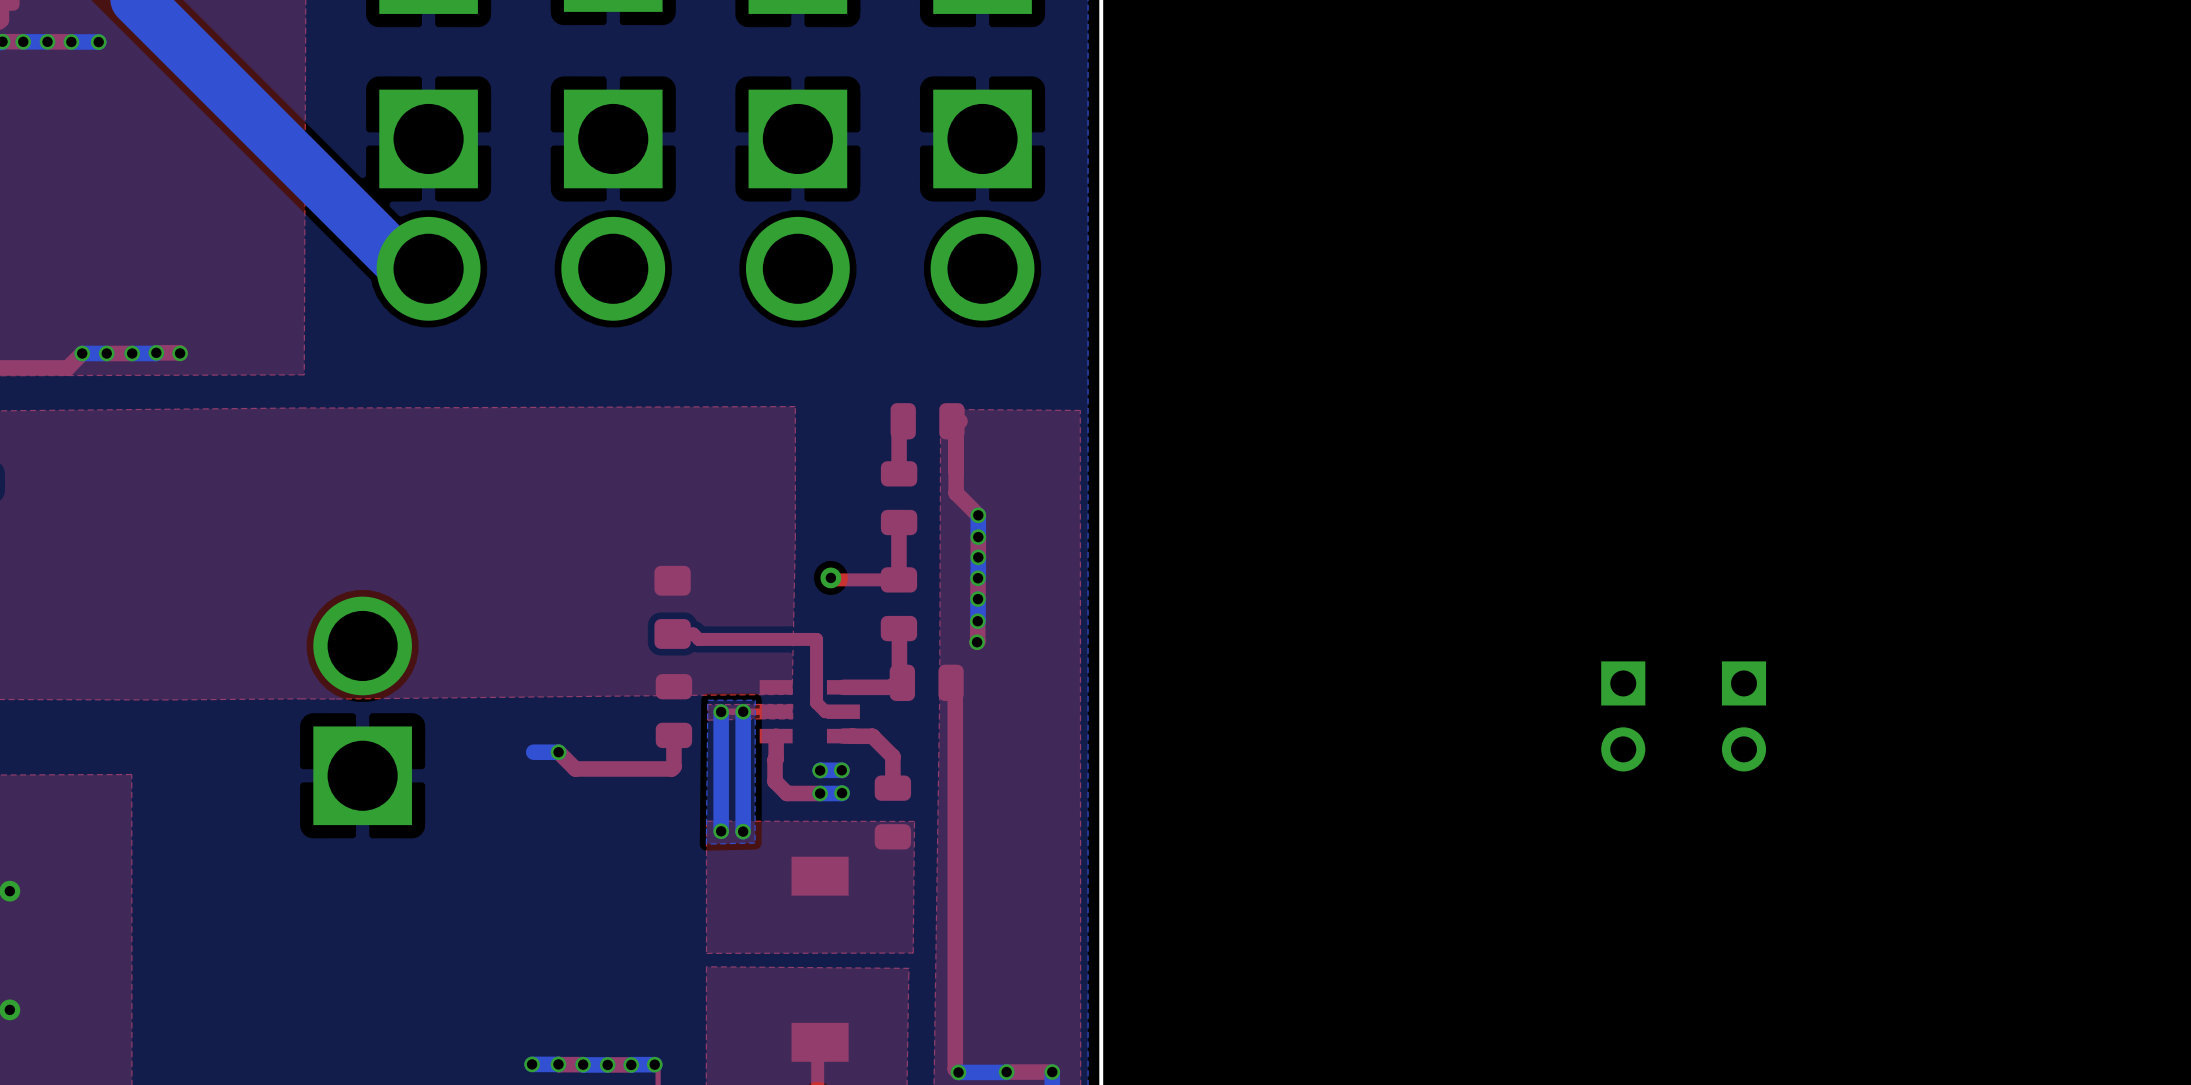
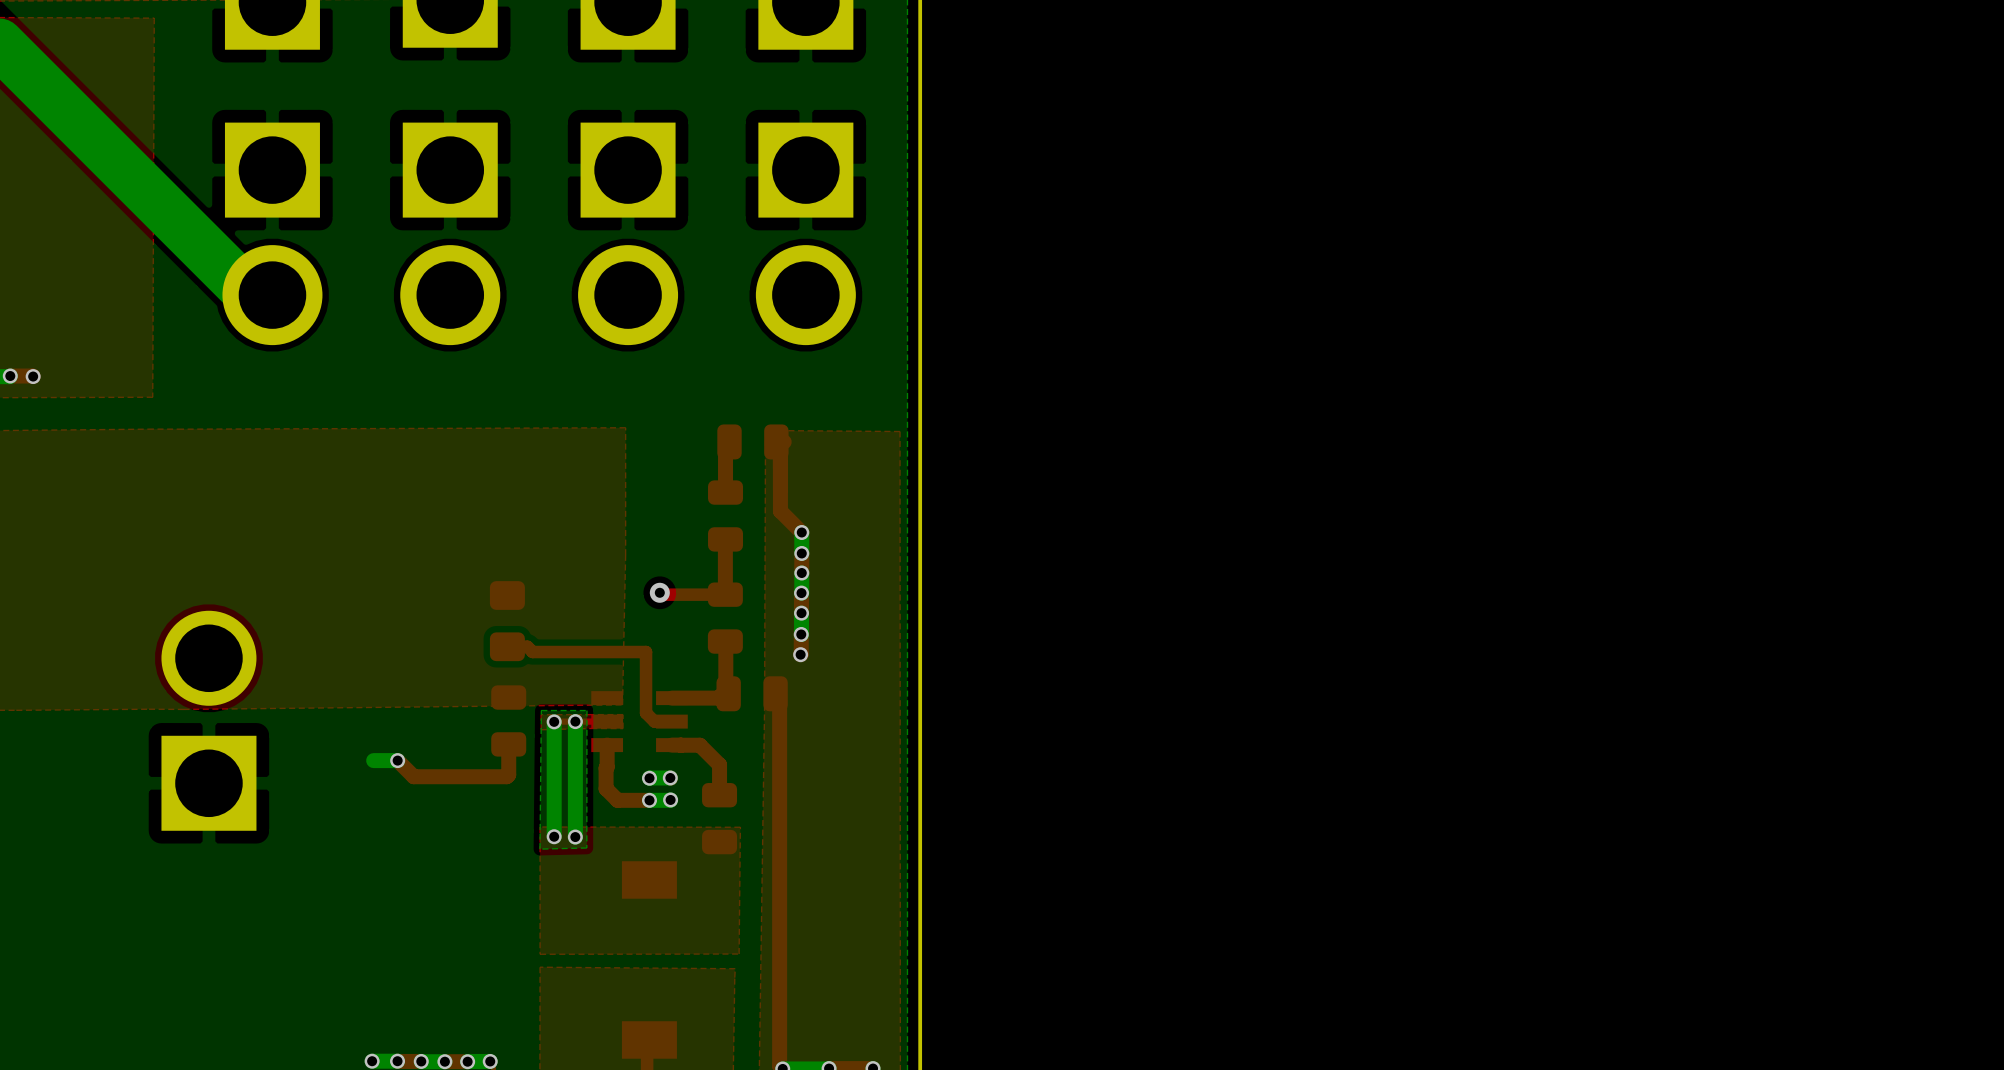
part: (1623, 716) -> none
part: (1743, 716) -> none

